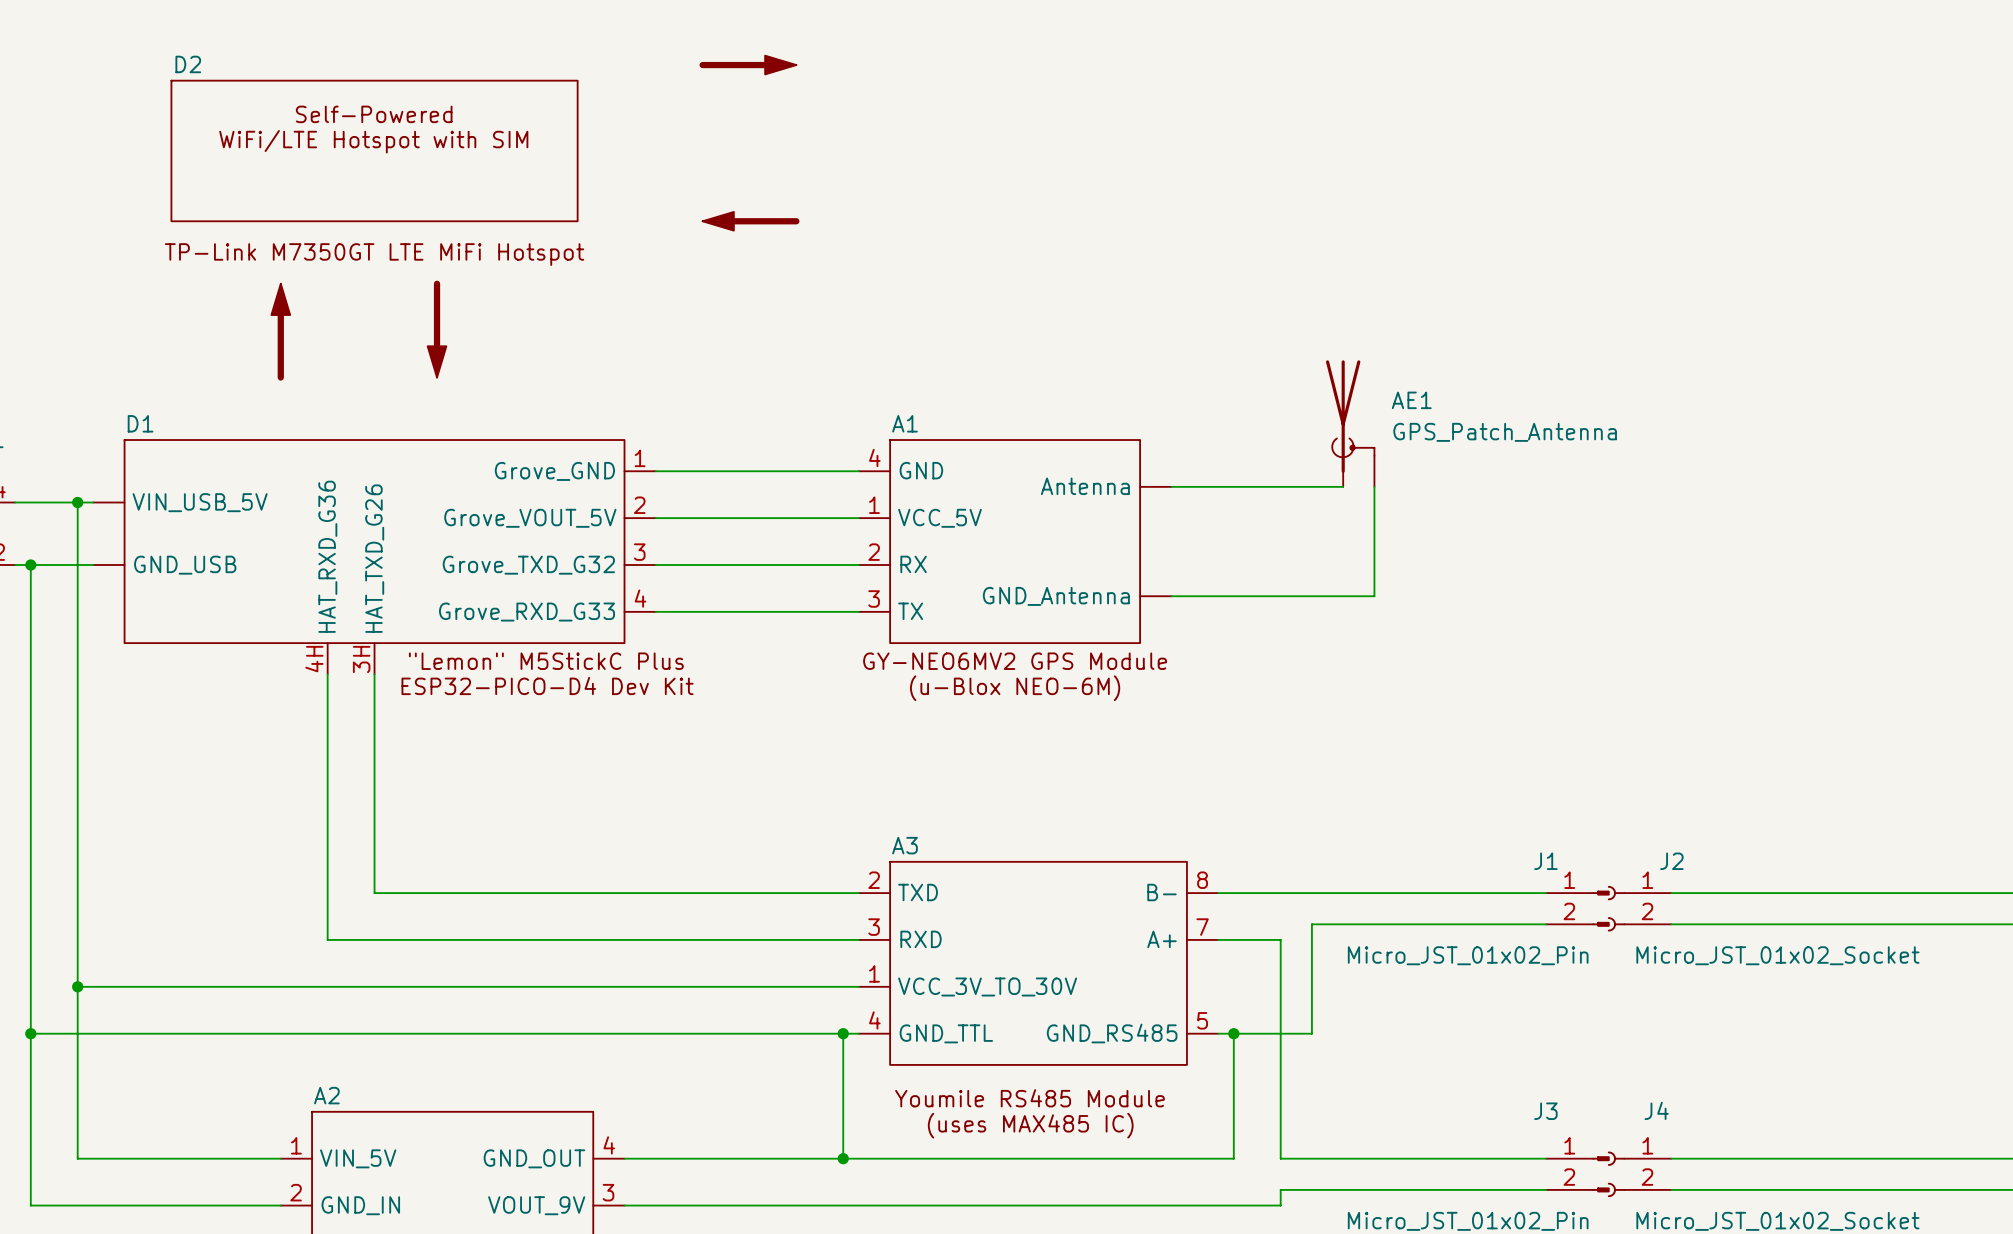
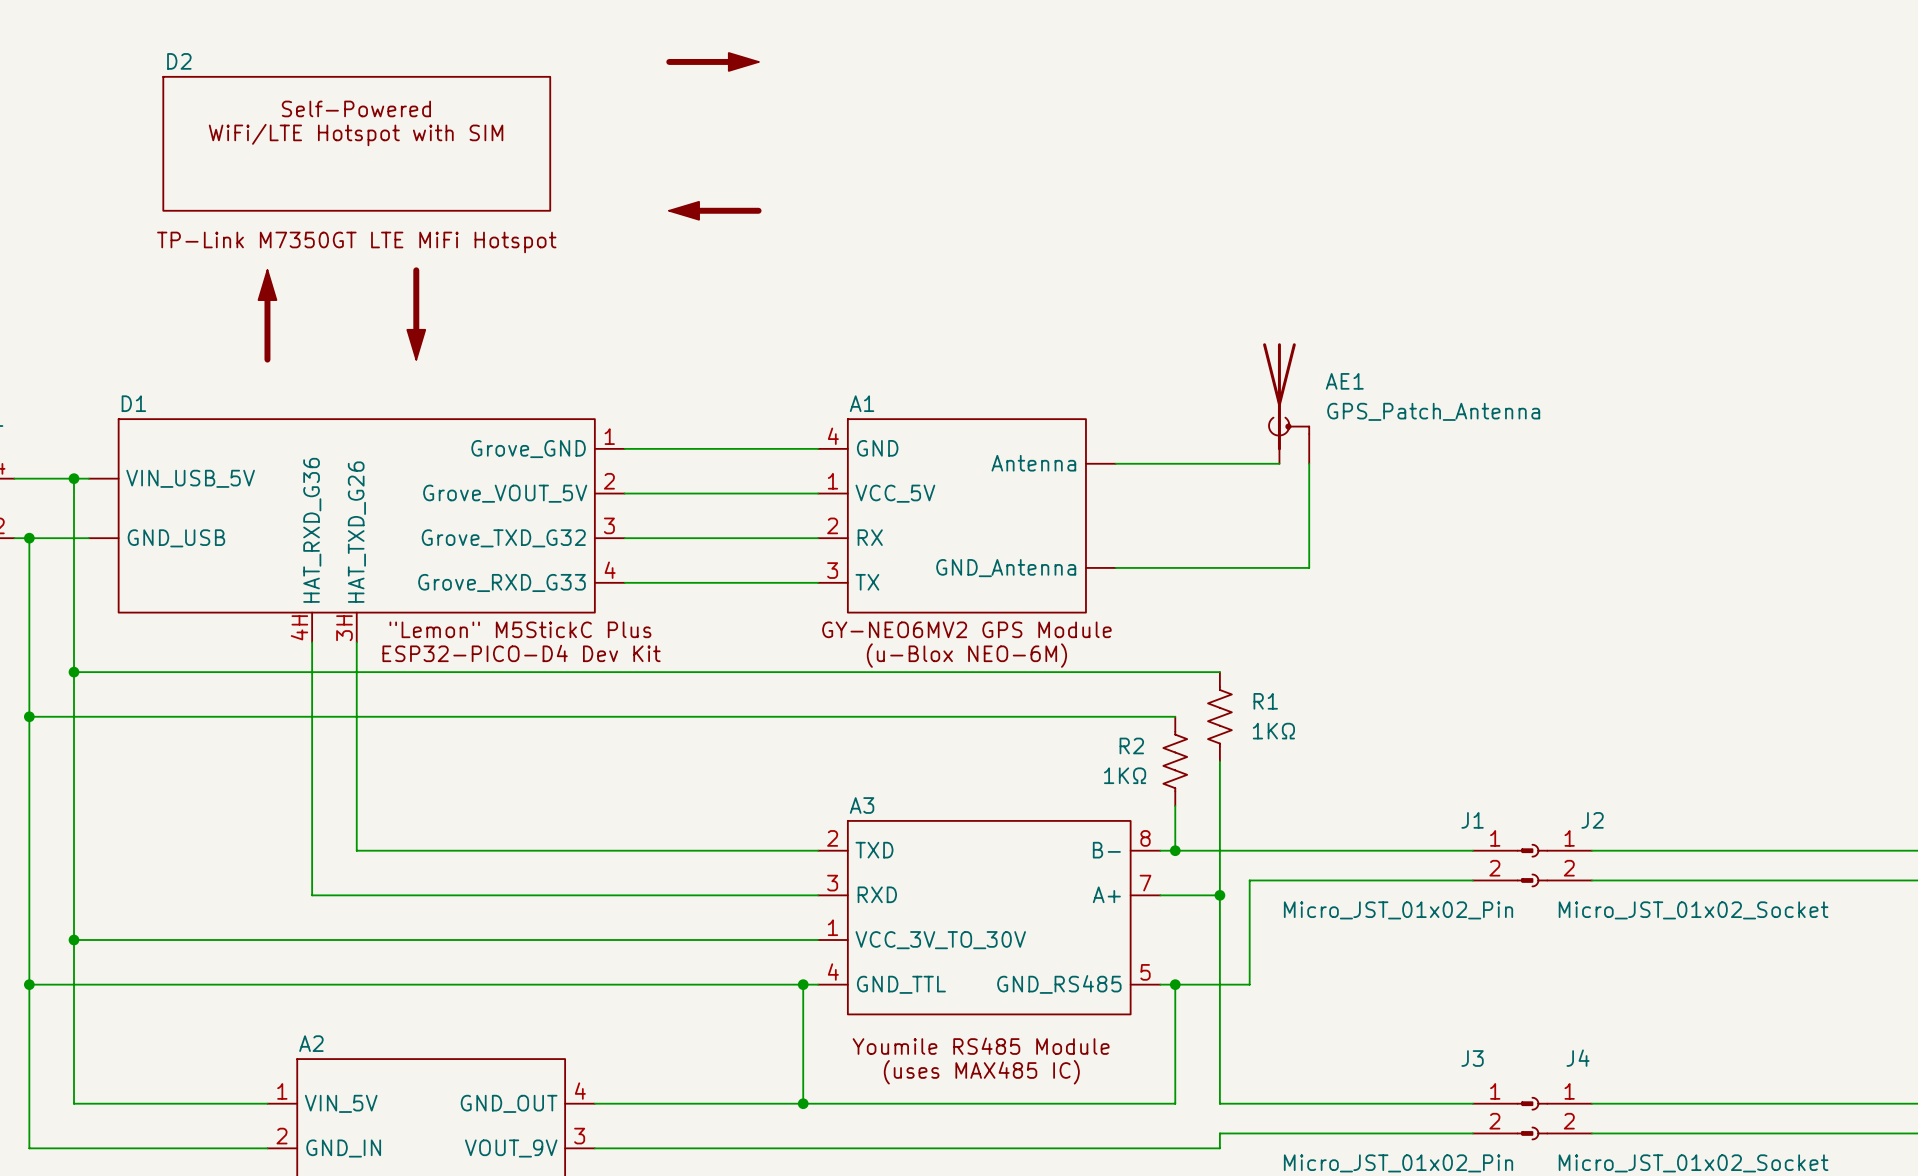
wire: none -> (74, 672) (1219, 672)
junction: none -> (74, 672)
wire: none -> (29, 716) (1175, 716)
junction: none -> (29, 716)
R1: none -> 1KΩ (1219, 716)
R2: none -> 1KΩ (1175, 761)
wire: none -> (1219, 761) (1219, 895)
wire: none -> (1175, 806) (1175, 850)
junction: none -> (1175, 850)
junction: none -> (1219, 895)

